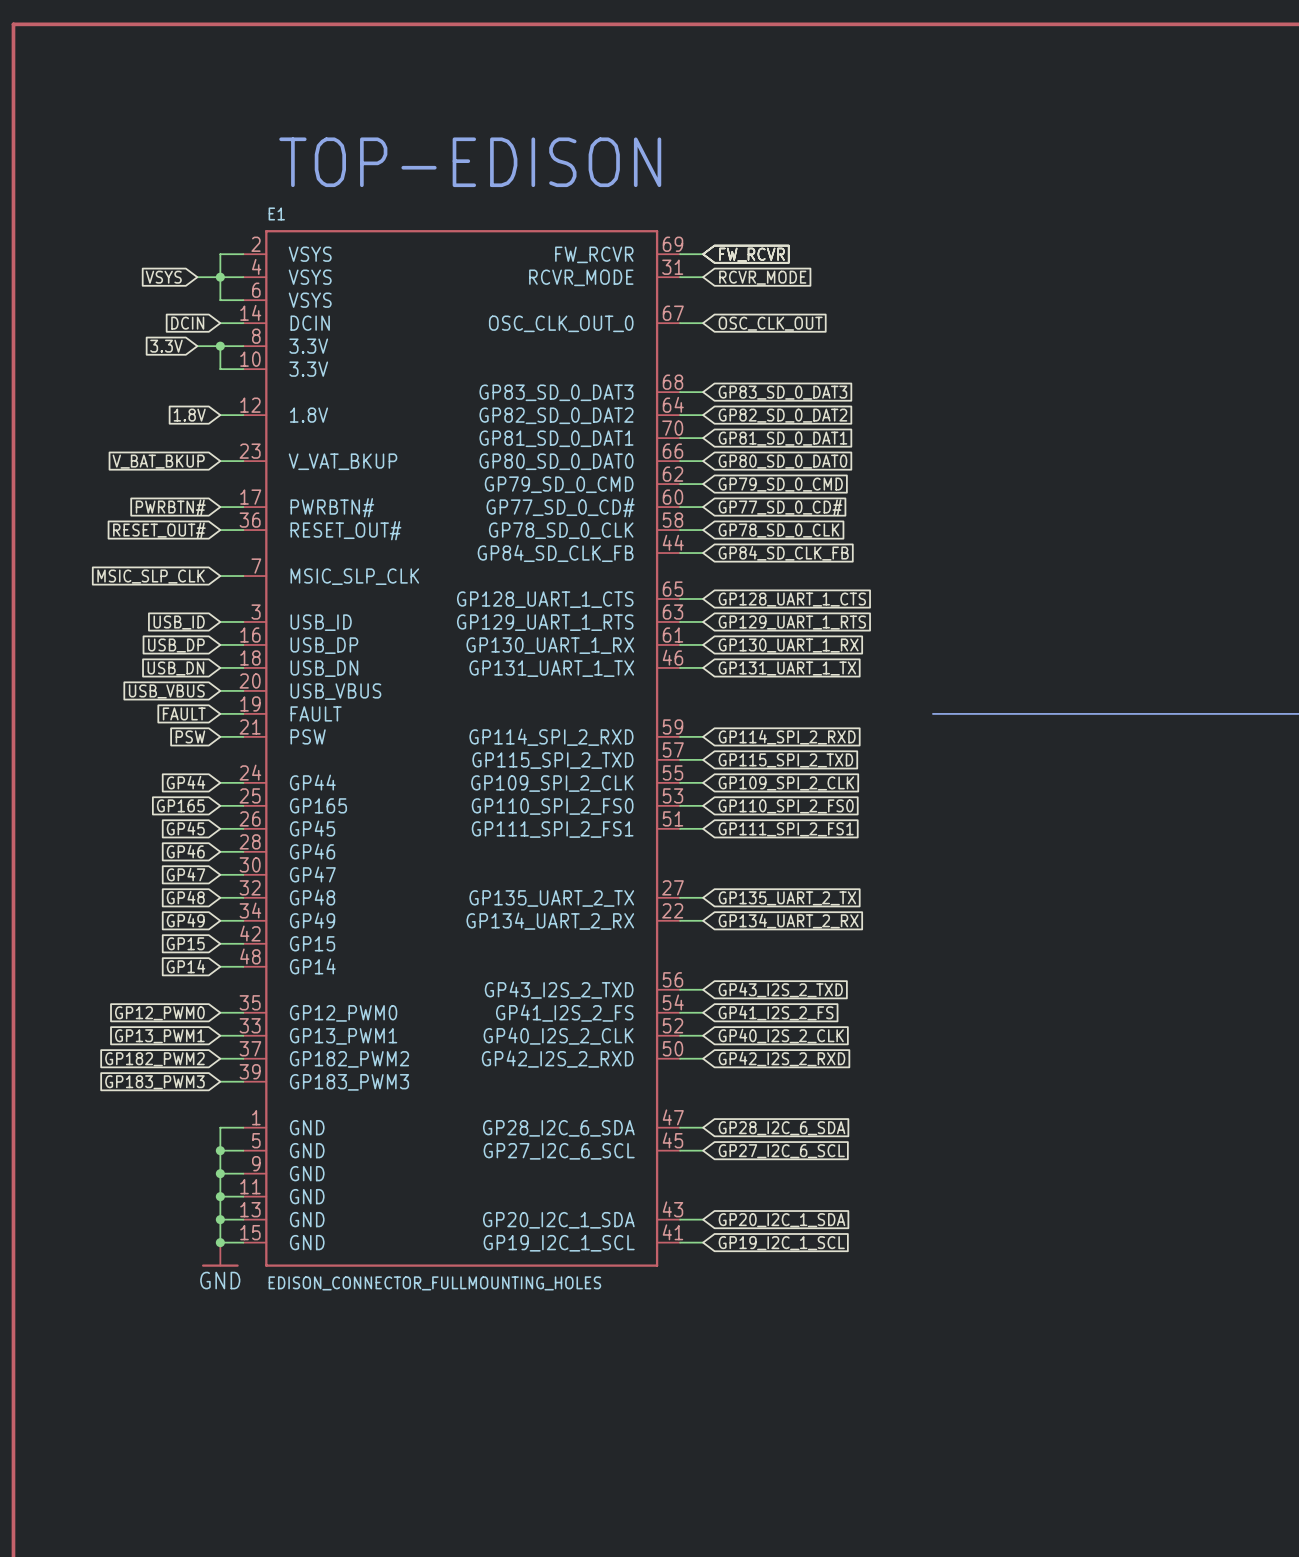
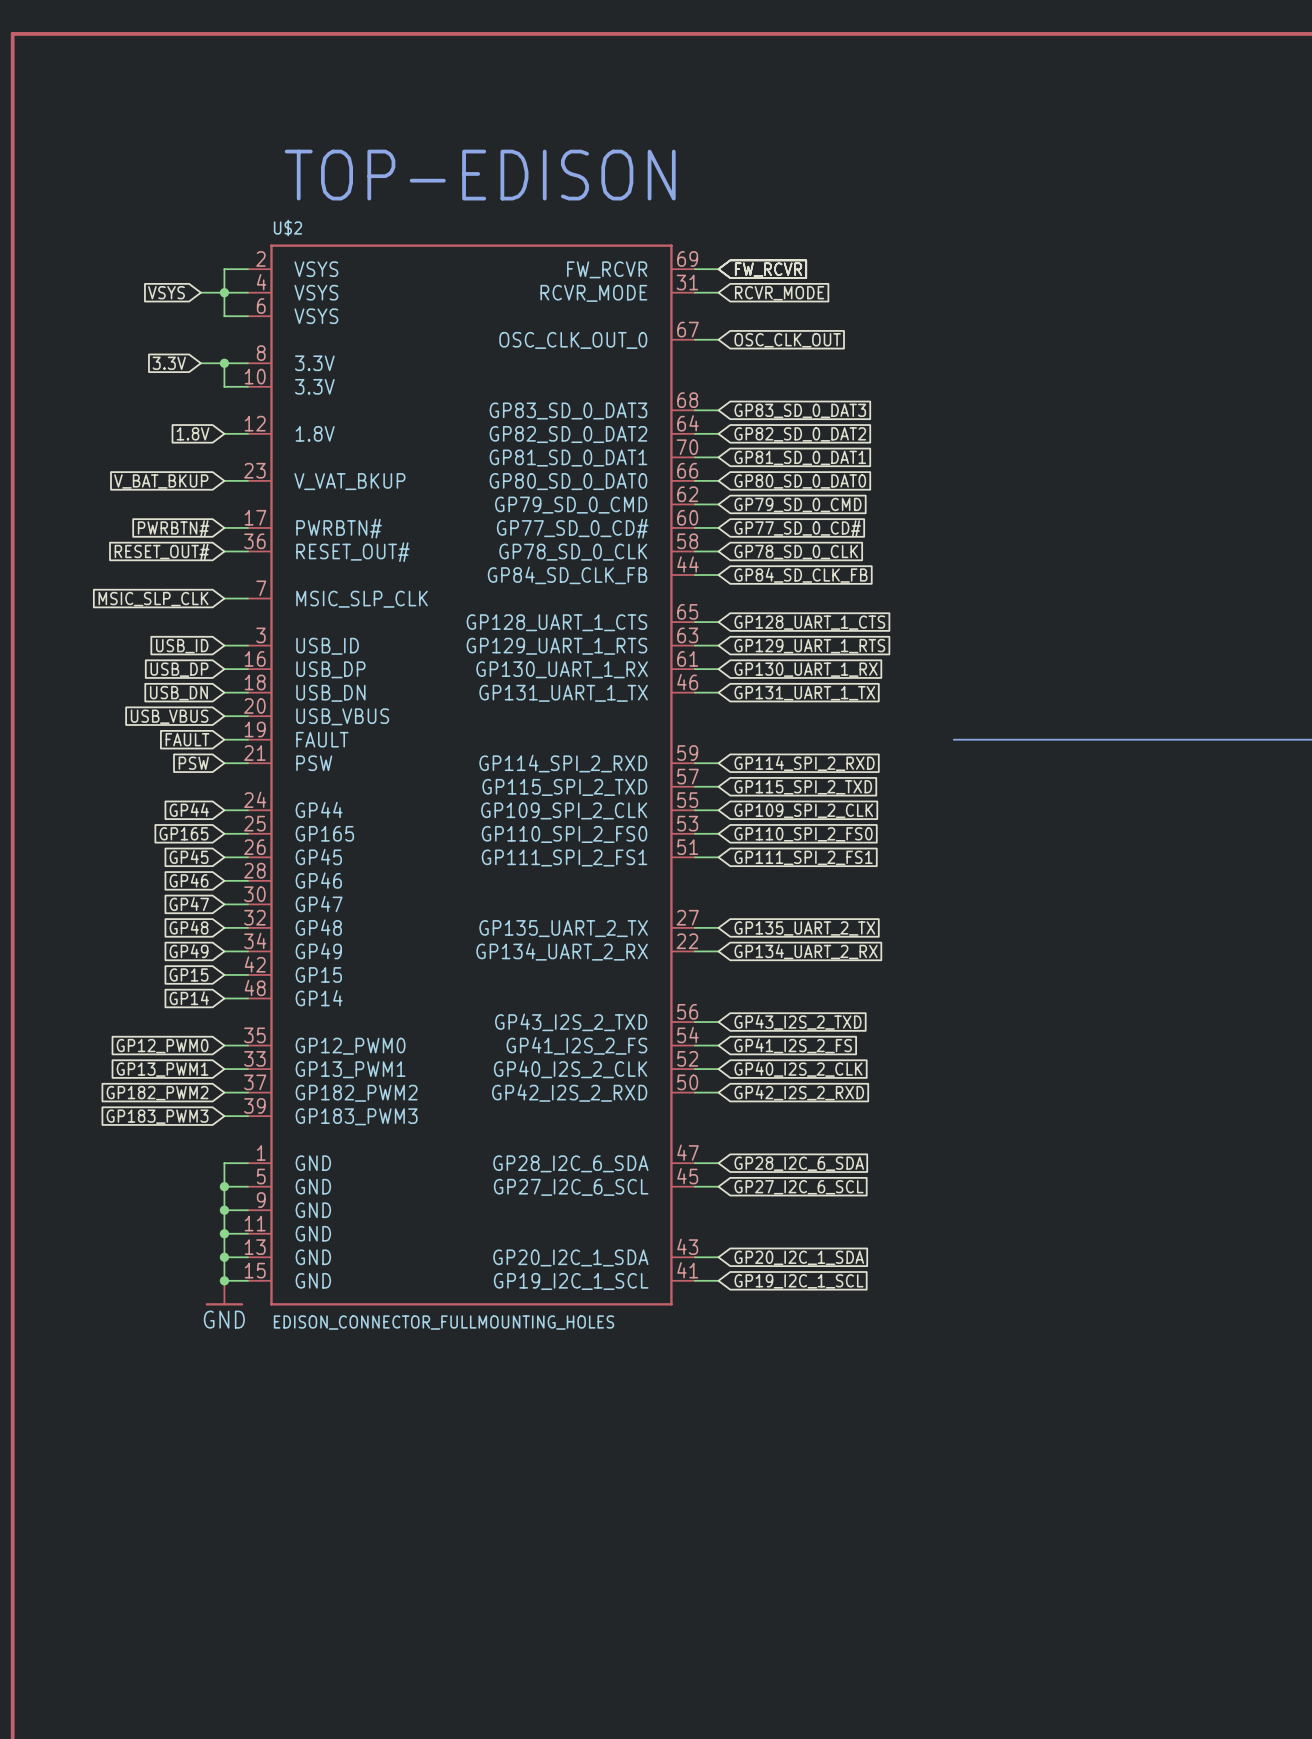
global label: DCIN (187, 323) -> none
wire: (220, 323) (243, 323) -> none
E1: EDISON_CONNECTOR_FULLMOUNTING_HOLES (461, 748) -> none
U$2: none -> EDISON_CONNECTOR_FULLMOUNTING_HOLES (471, 774)

